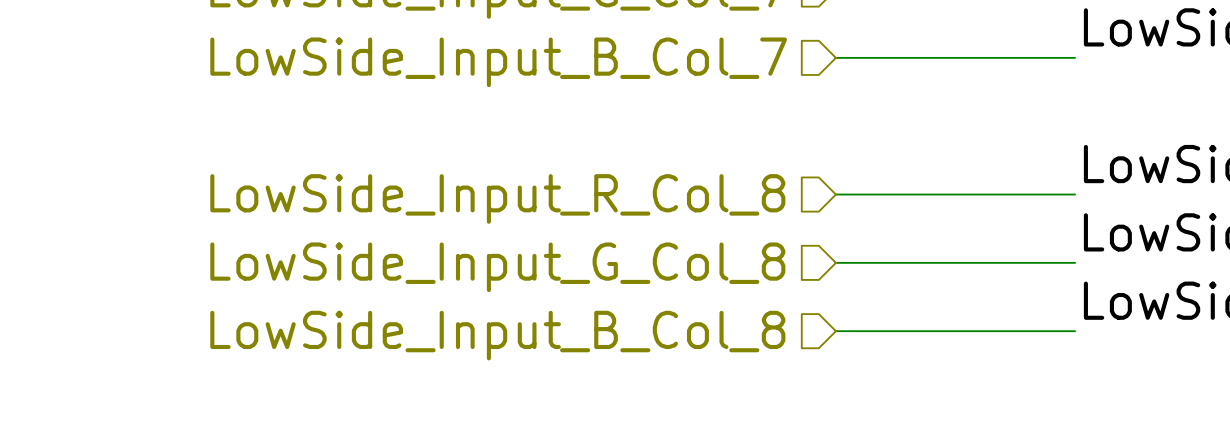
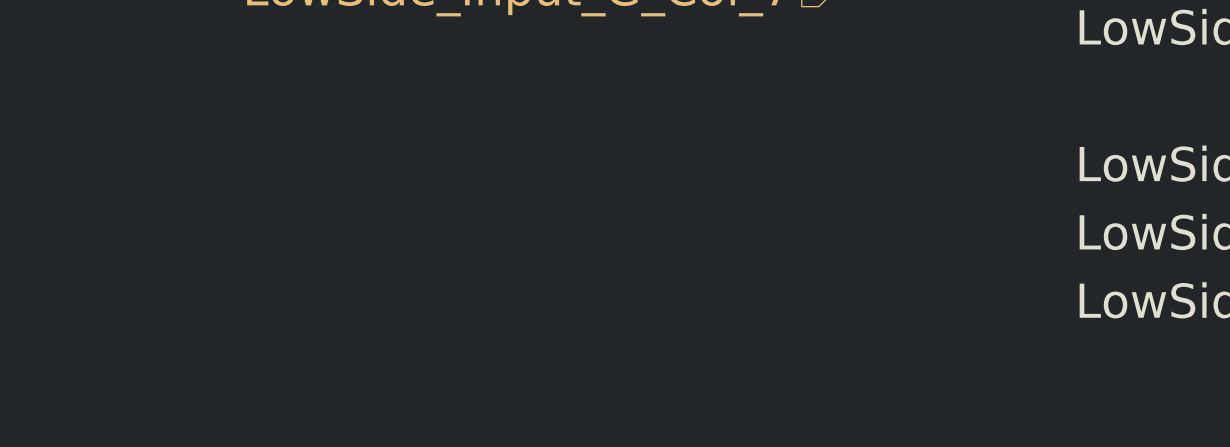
wire: (835, 57) (1075, 57) -> none
hierarchical label: LowSide_Input_B_Col_7 (498, 62) -> none
wire: (835, 194) (1075, 194) -> none
hierarchical label: LowSide_Input_R_Col_8 (497, 198) -> none
wire: (835, 262) (1075, 262) -> none
hierarchical label: LowSide_Input_G_Col_8 (497, 267) -> none
wire: (835, 331) (1075, 331) -> none
hierarchical label: LowSide_Input_B_Col_8 (497, 335) -> none

